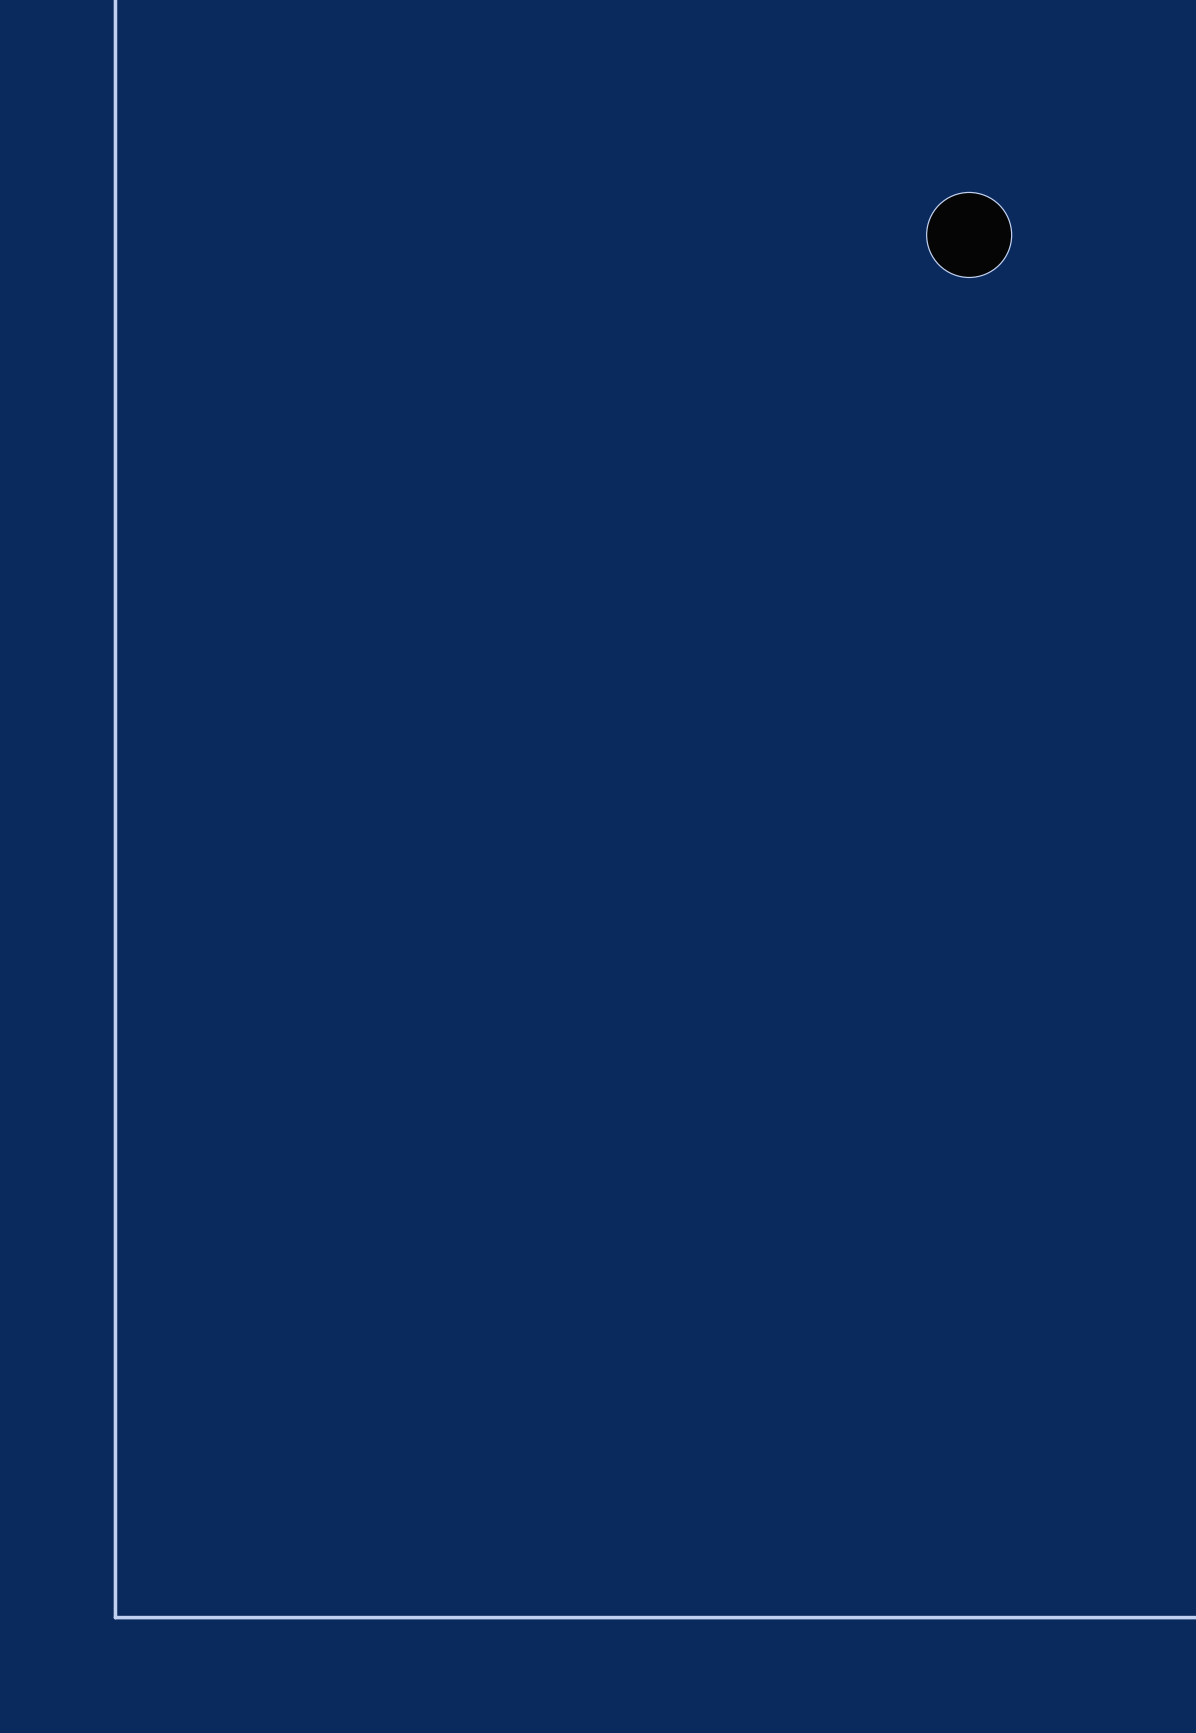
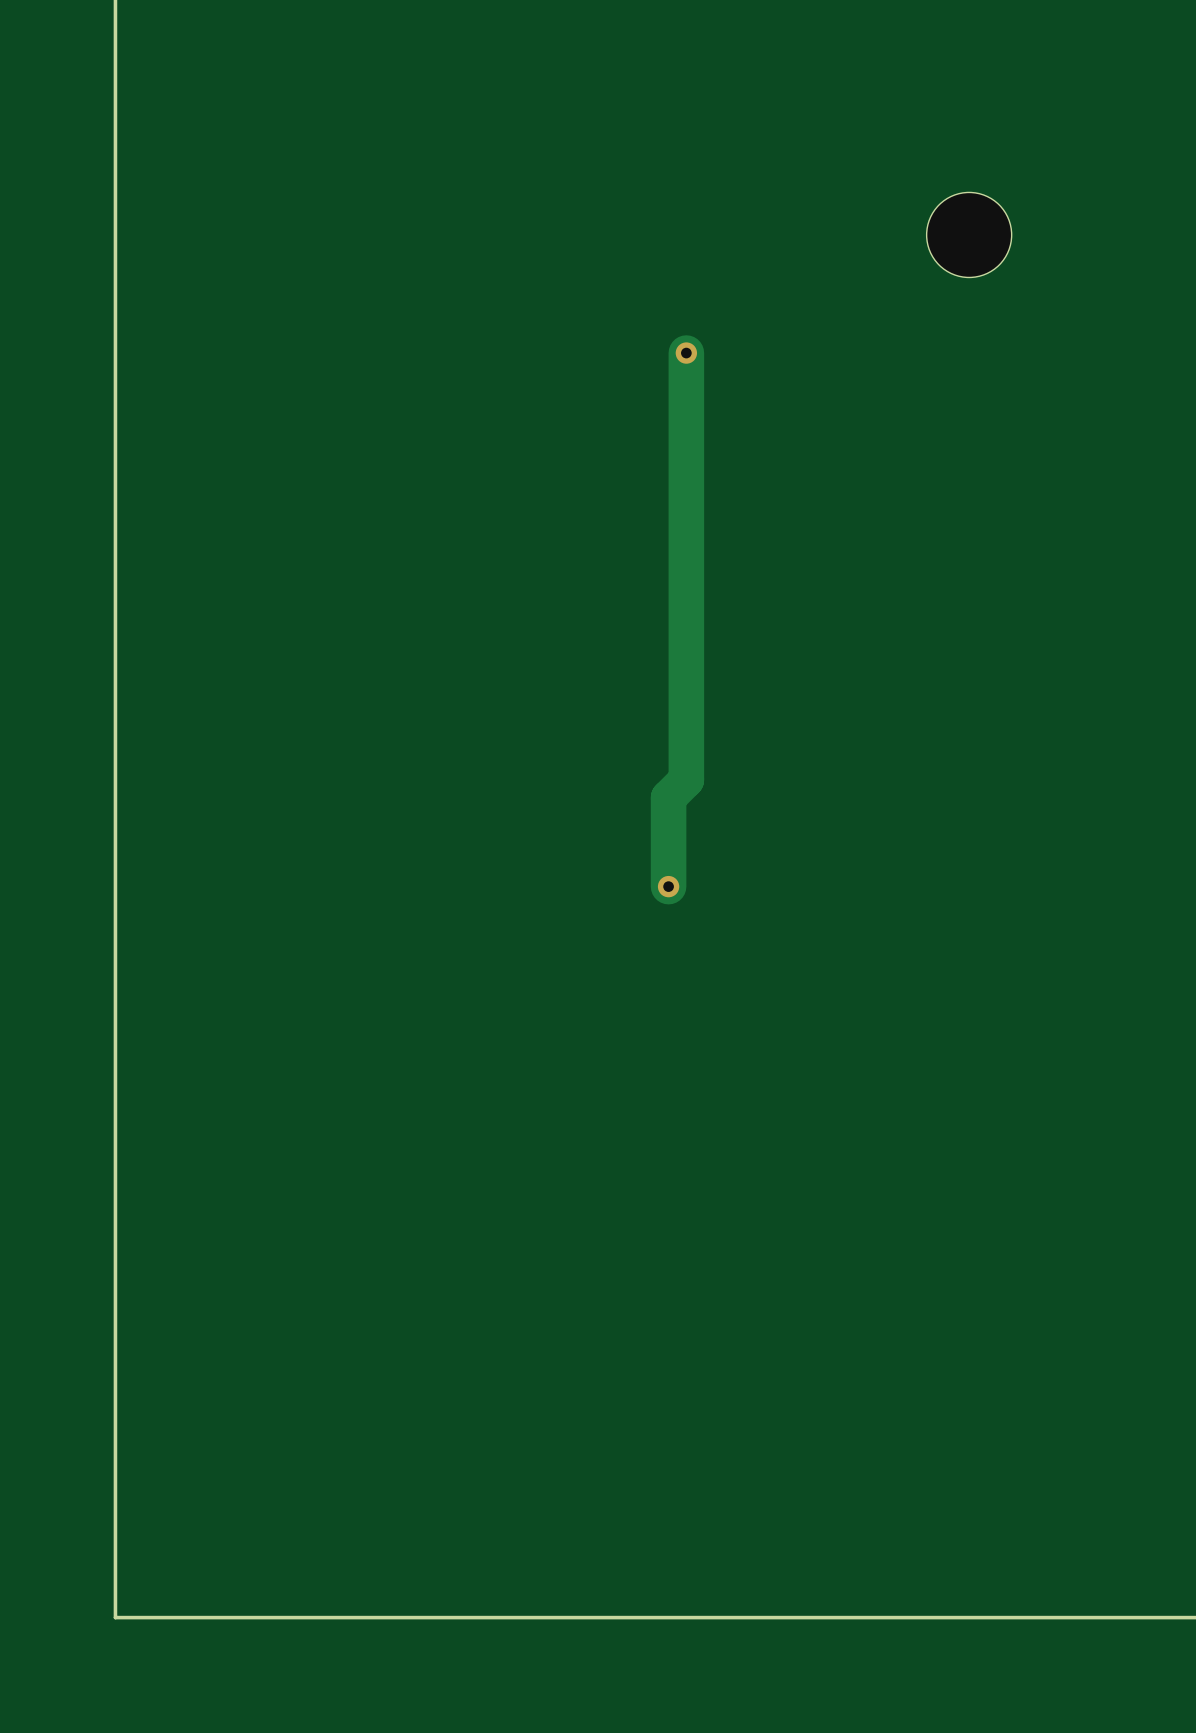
track: none -> (686, 353) (686, 779) (668, 797) (668, 886)
via: none -> (686, 353)
via: none -> (668, 886)

